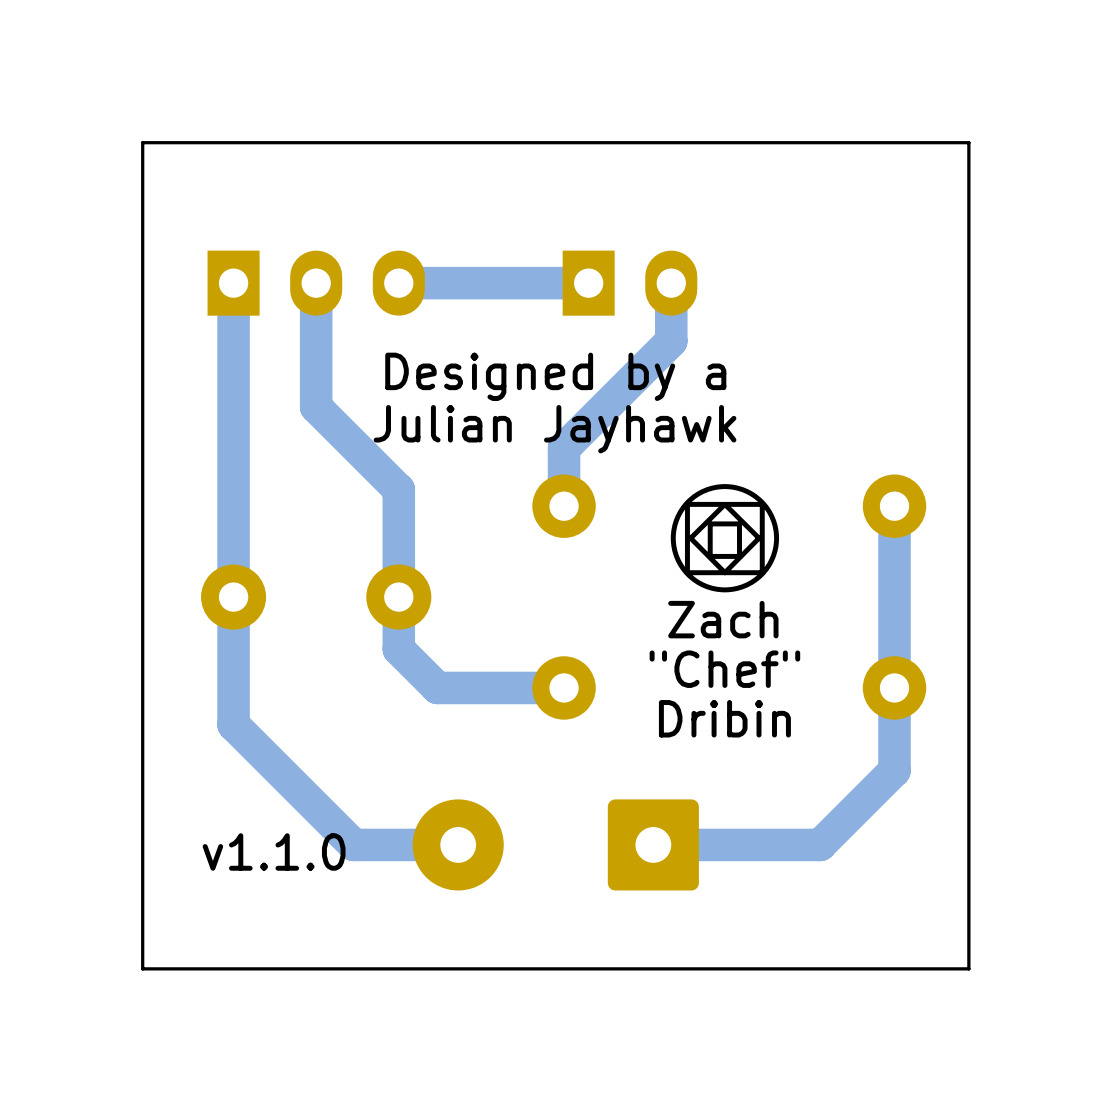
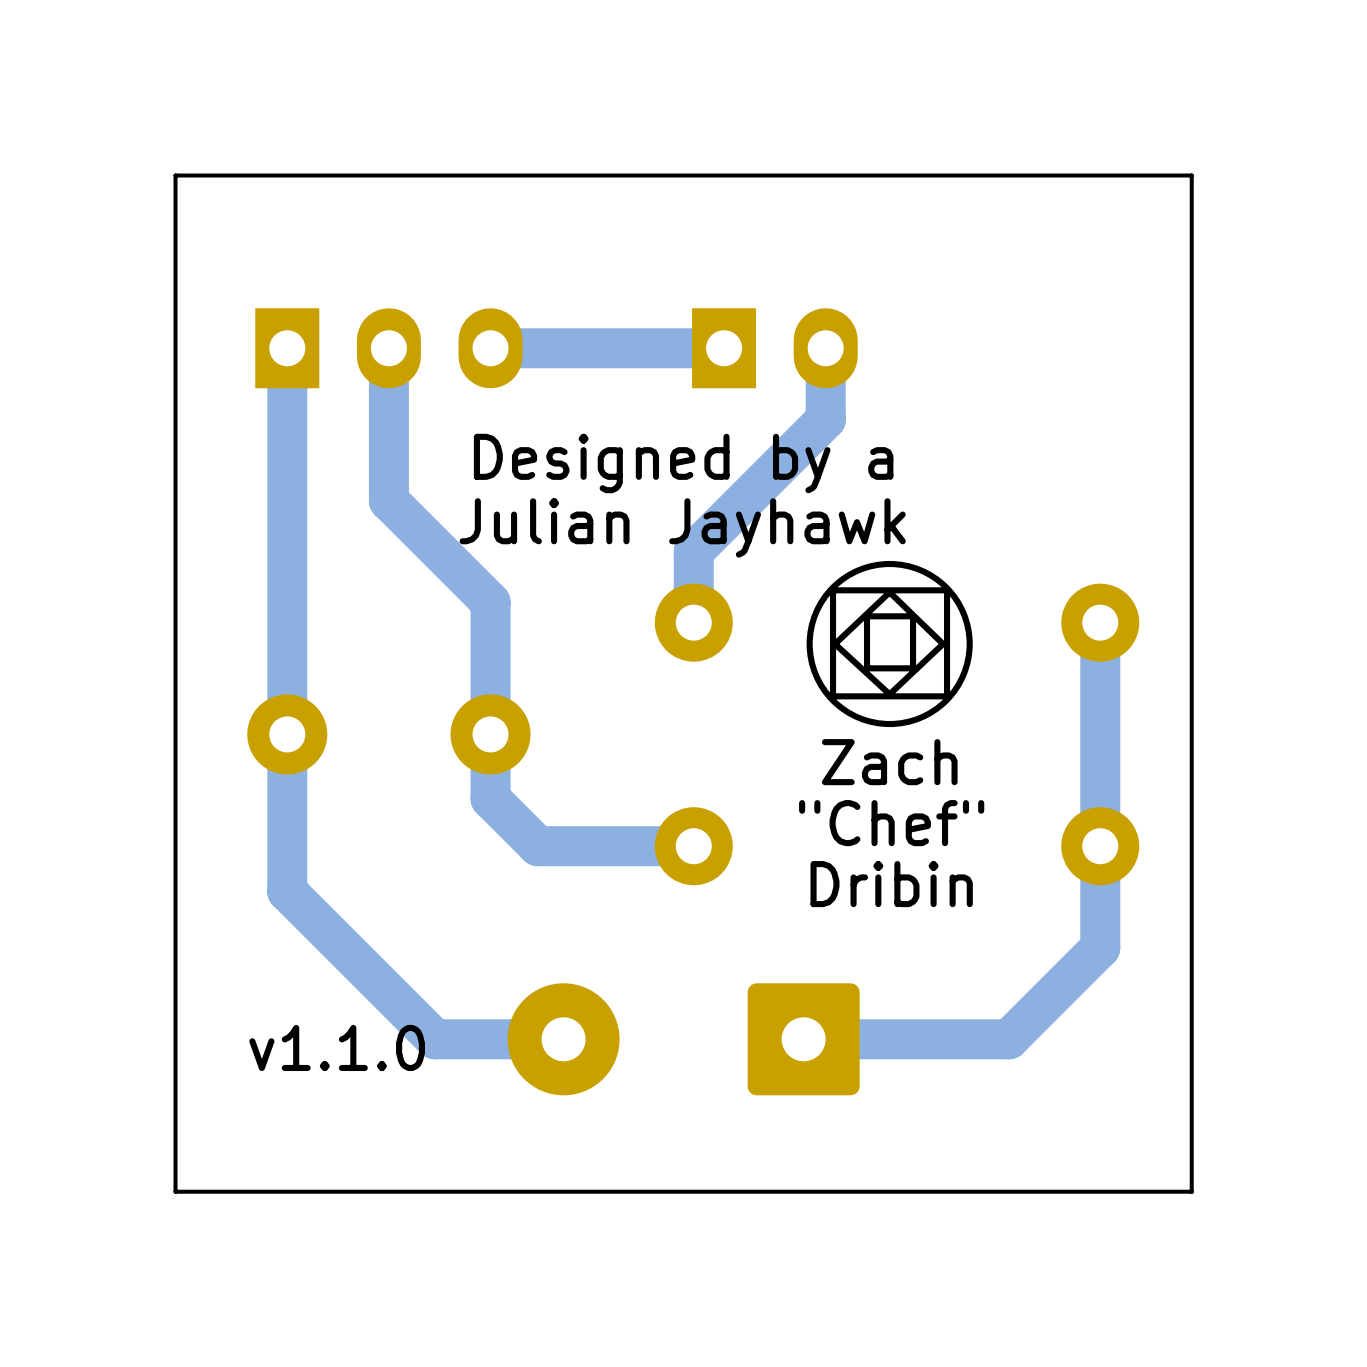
drawing shape: [670, 484, 780, 593] -> [806, 560, 973, 728]
line: none -> (913, 616) (867, 616) (867, 668) (913, 668) (913, 616)
line: (724, 504) (759, 538) (724, 572) (690, 538) (724, 504) -> (889, 592) (943, 644) (889, 694) (835, 644) (889, 592)
line: (762, 504) (687, 504) (687, 572) (762, 572) (762, 504) -> (947, 590) (947, 696) (833, 696) (833, 590) (947, 590)
line: (739, 523) (710, 523) (710, 556) (739, 556) (739, 523) -> none

